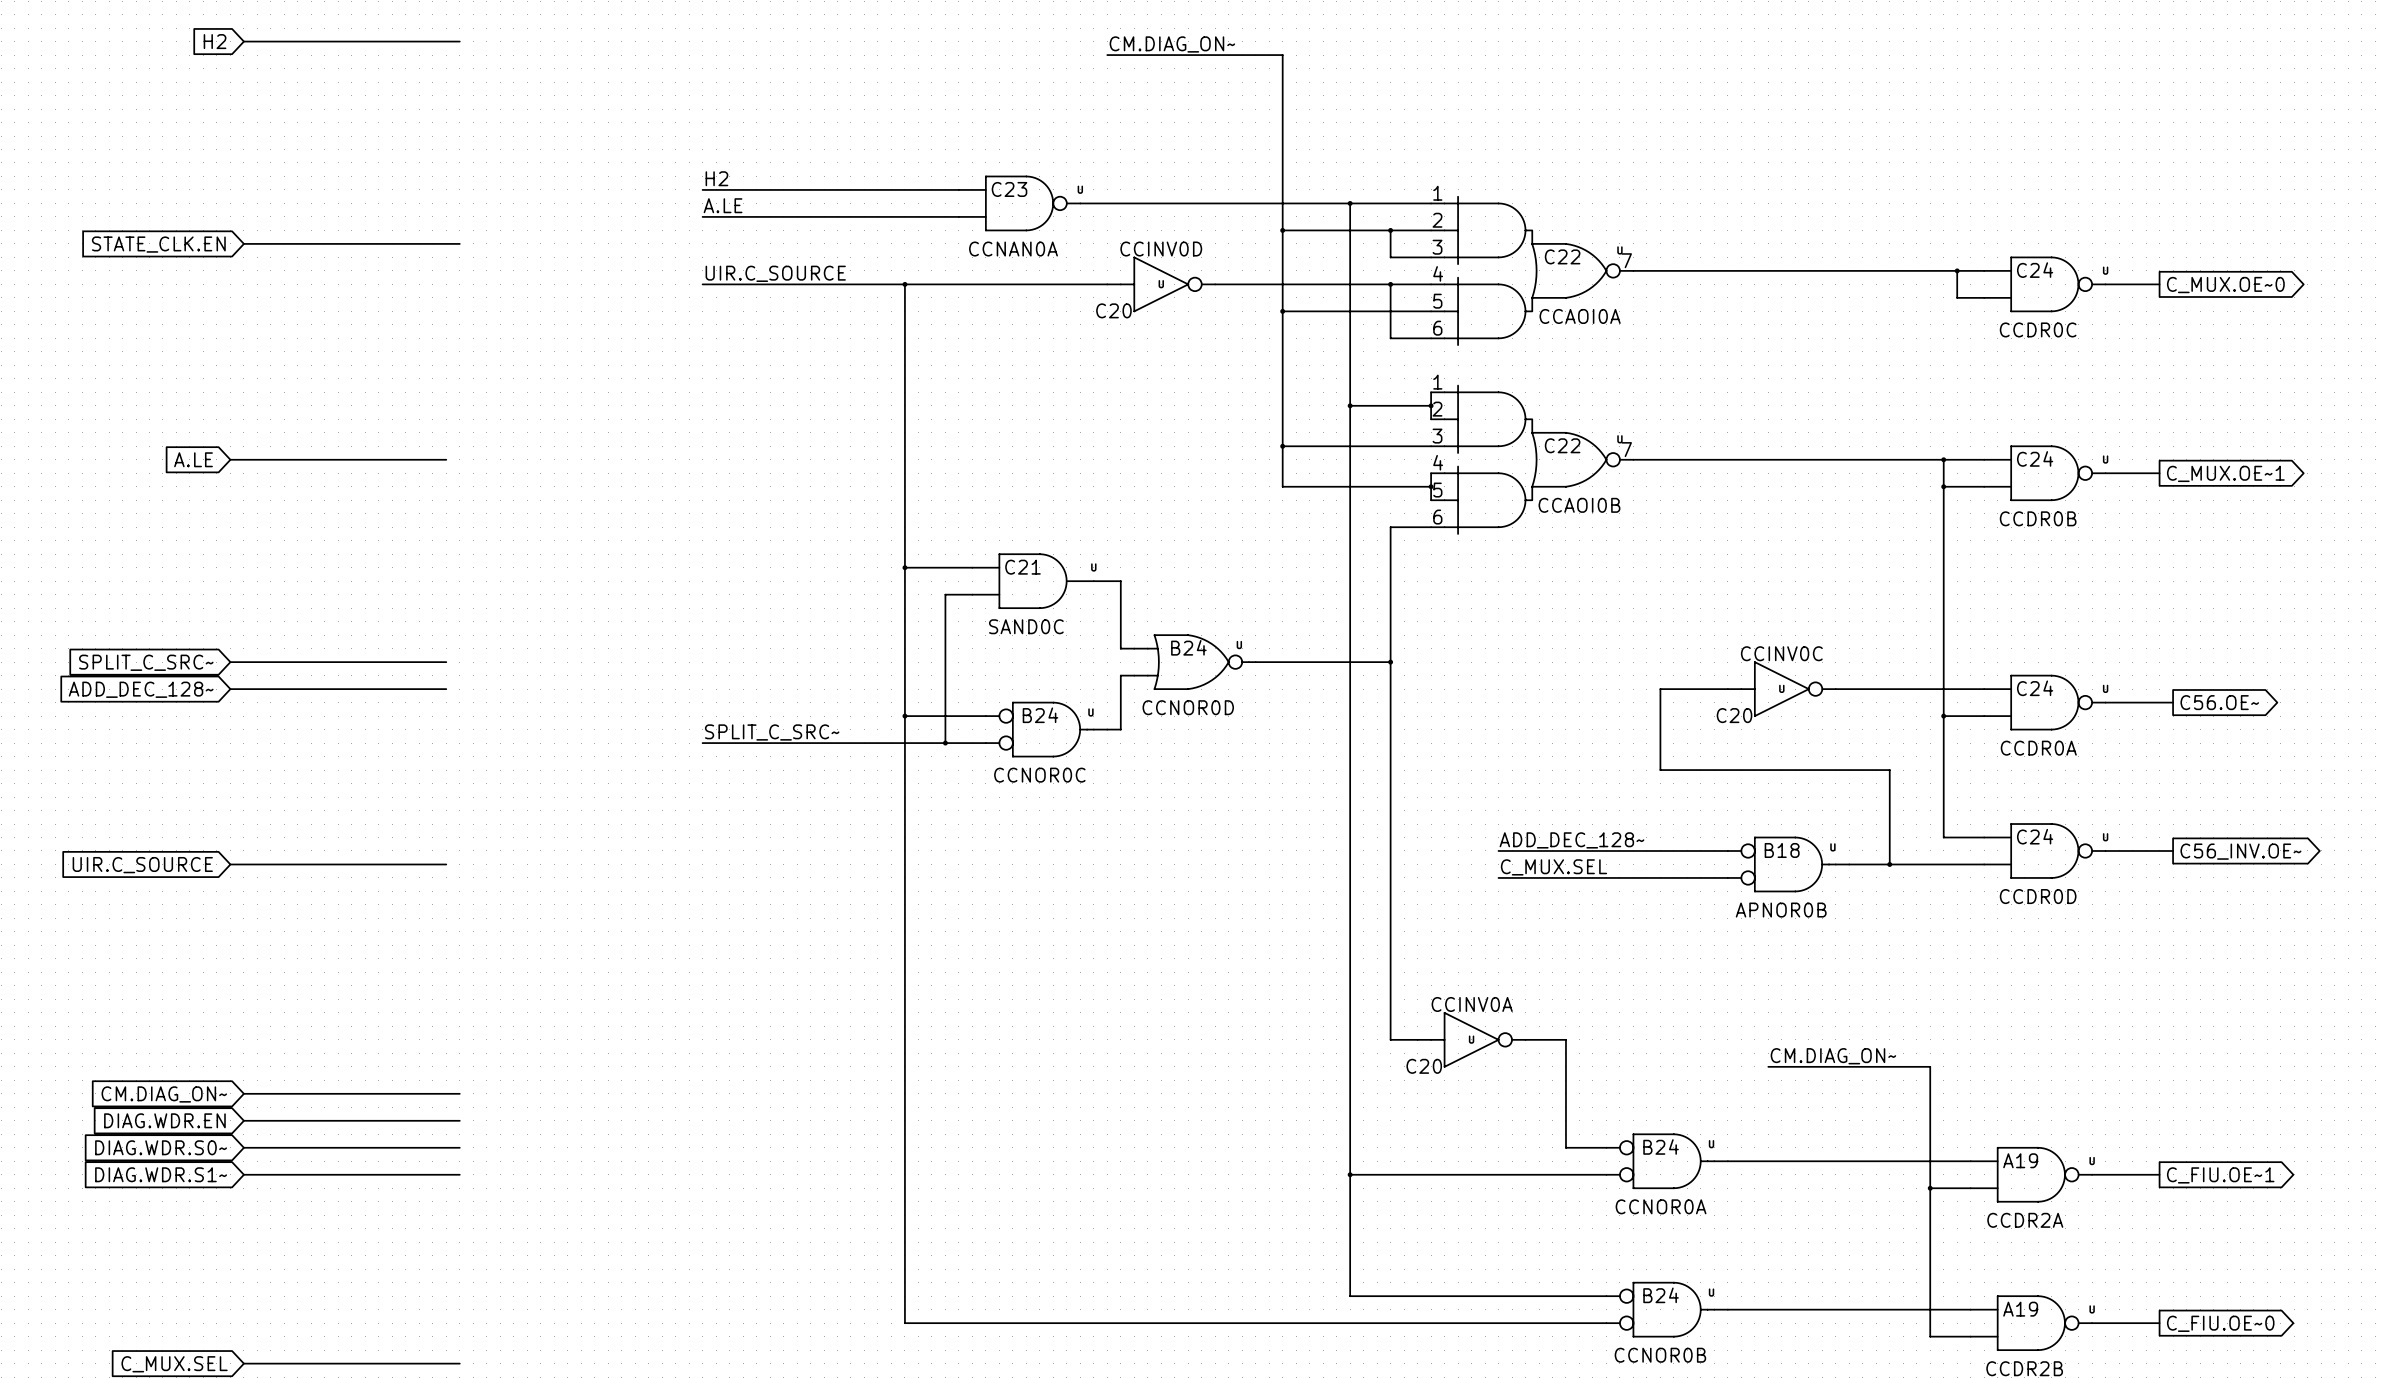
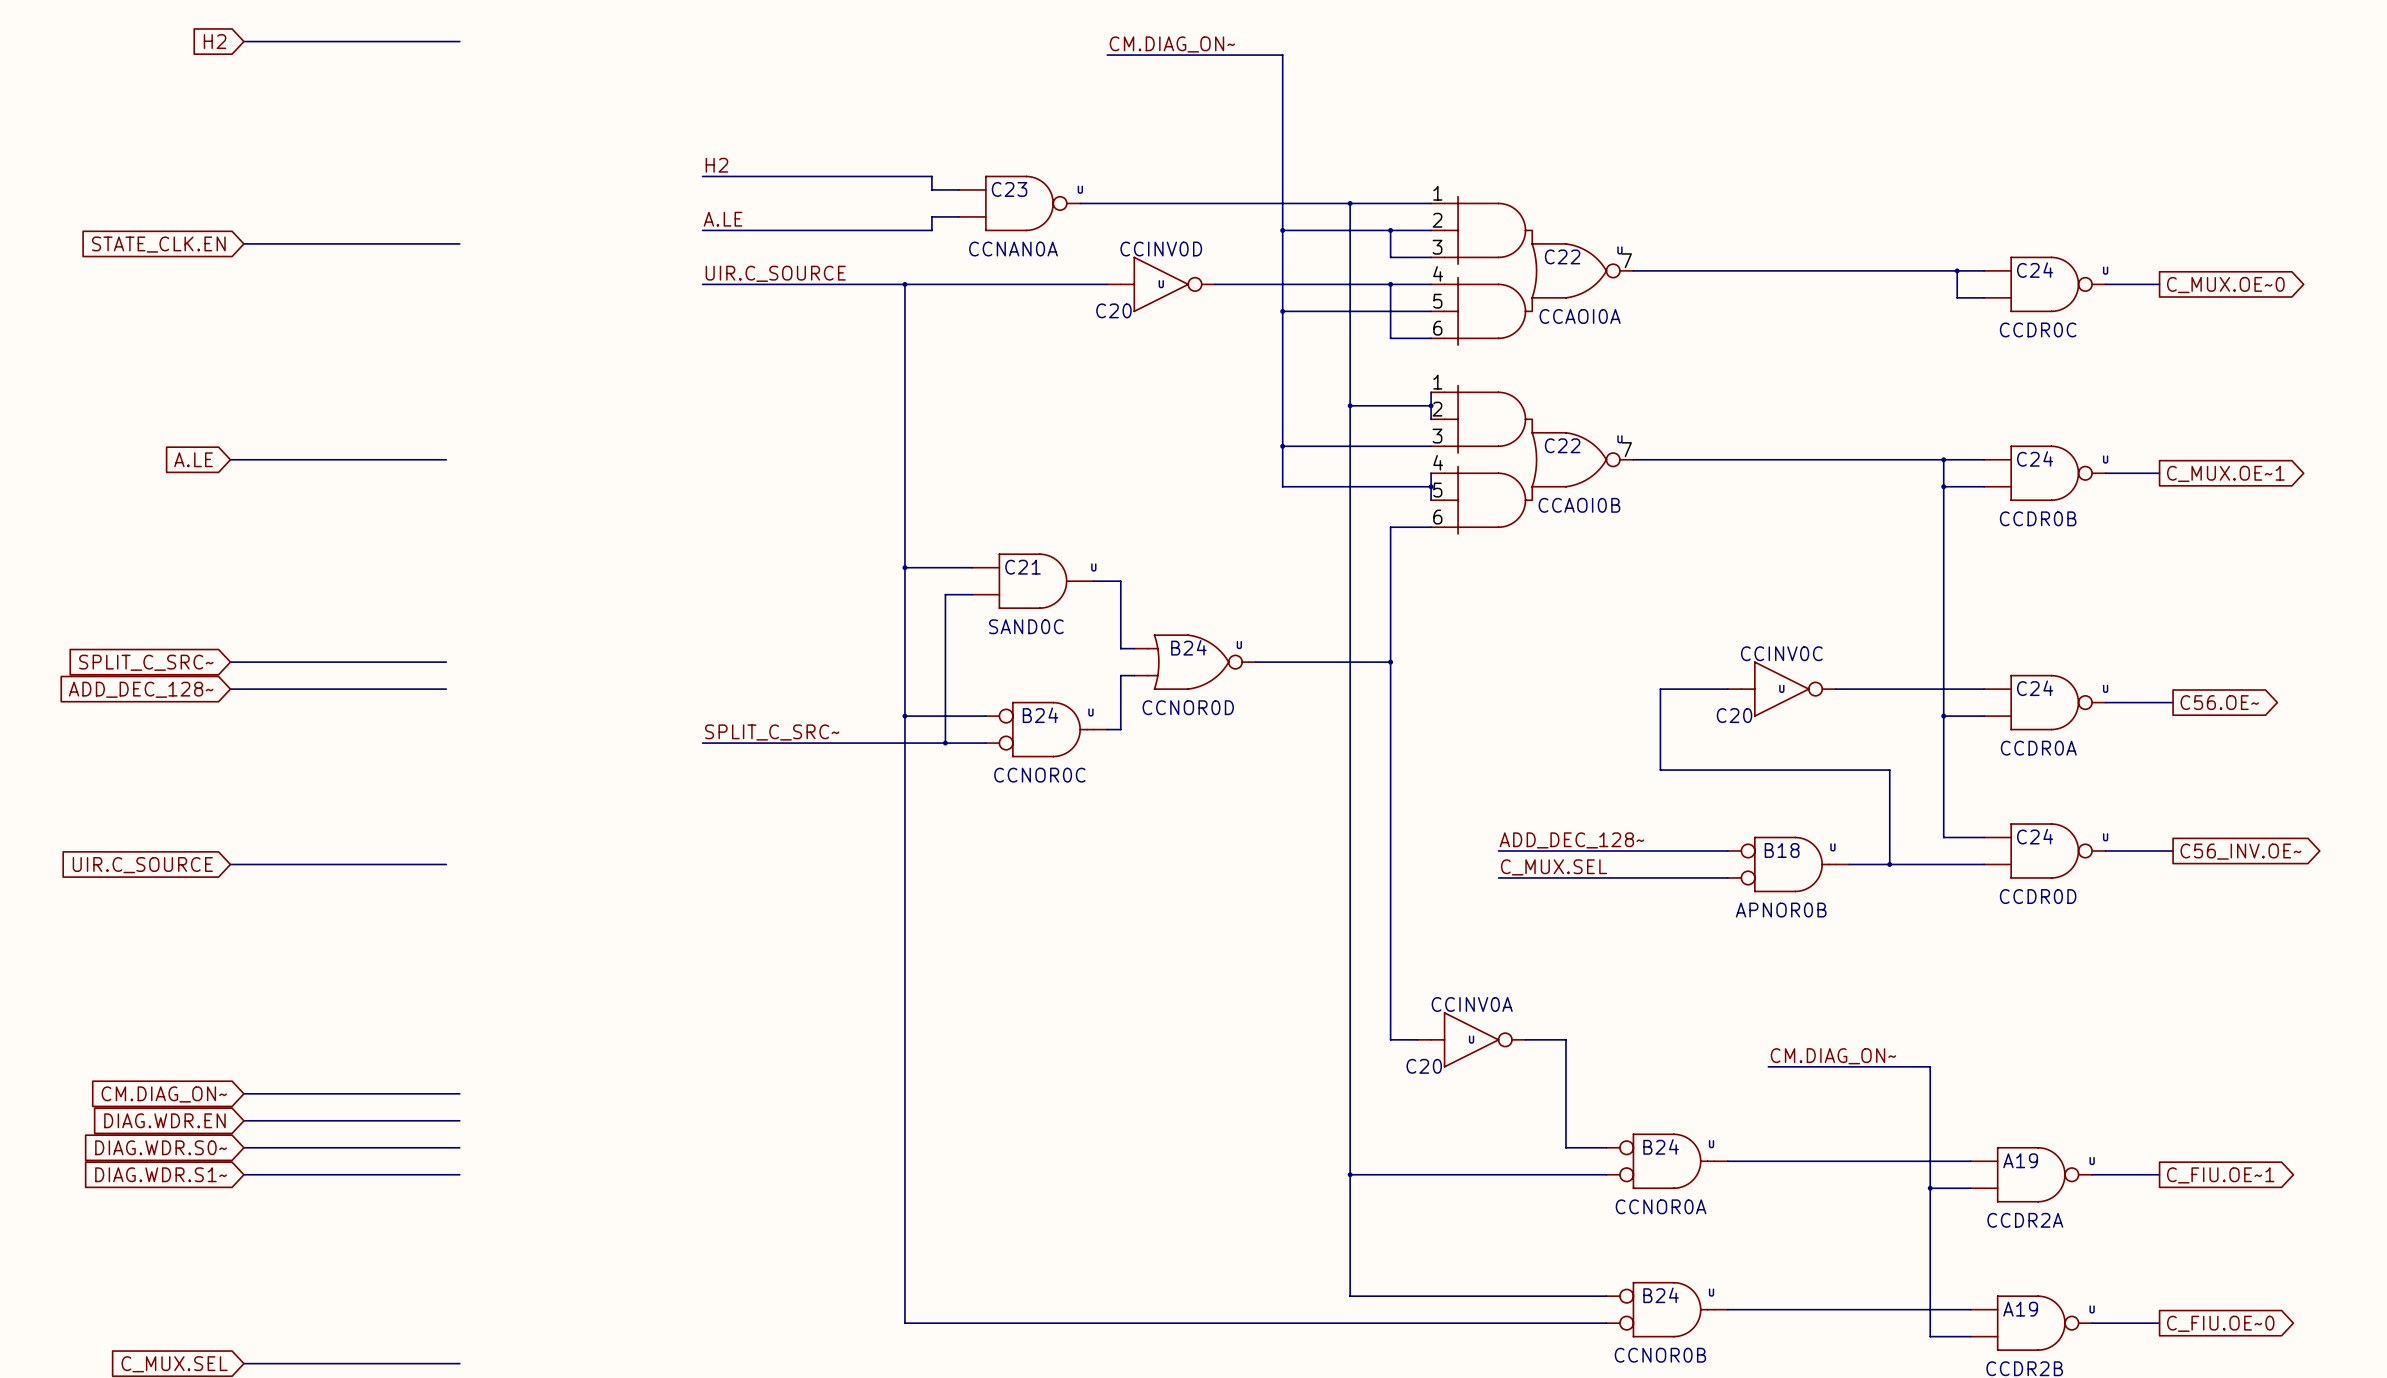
label position: H2 (716, 178) -> H2 (716, 165)
wire: (702, 189) (931, 189) -> (702, 176) (931, 176) (931, 189)
label position: A.LE (723, 205) -> A.LE (723, 219)
wire: (702, 216) (931, 216) -> (702, 230) (931, 230) (931, 216)

